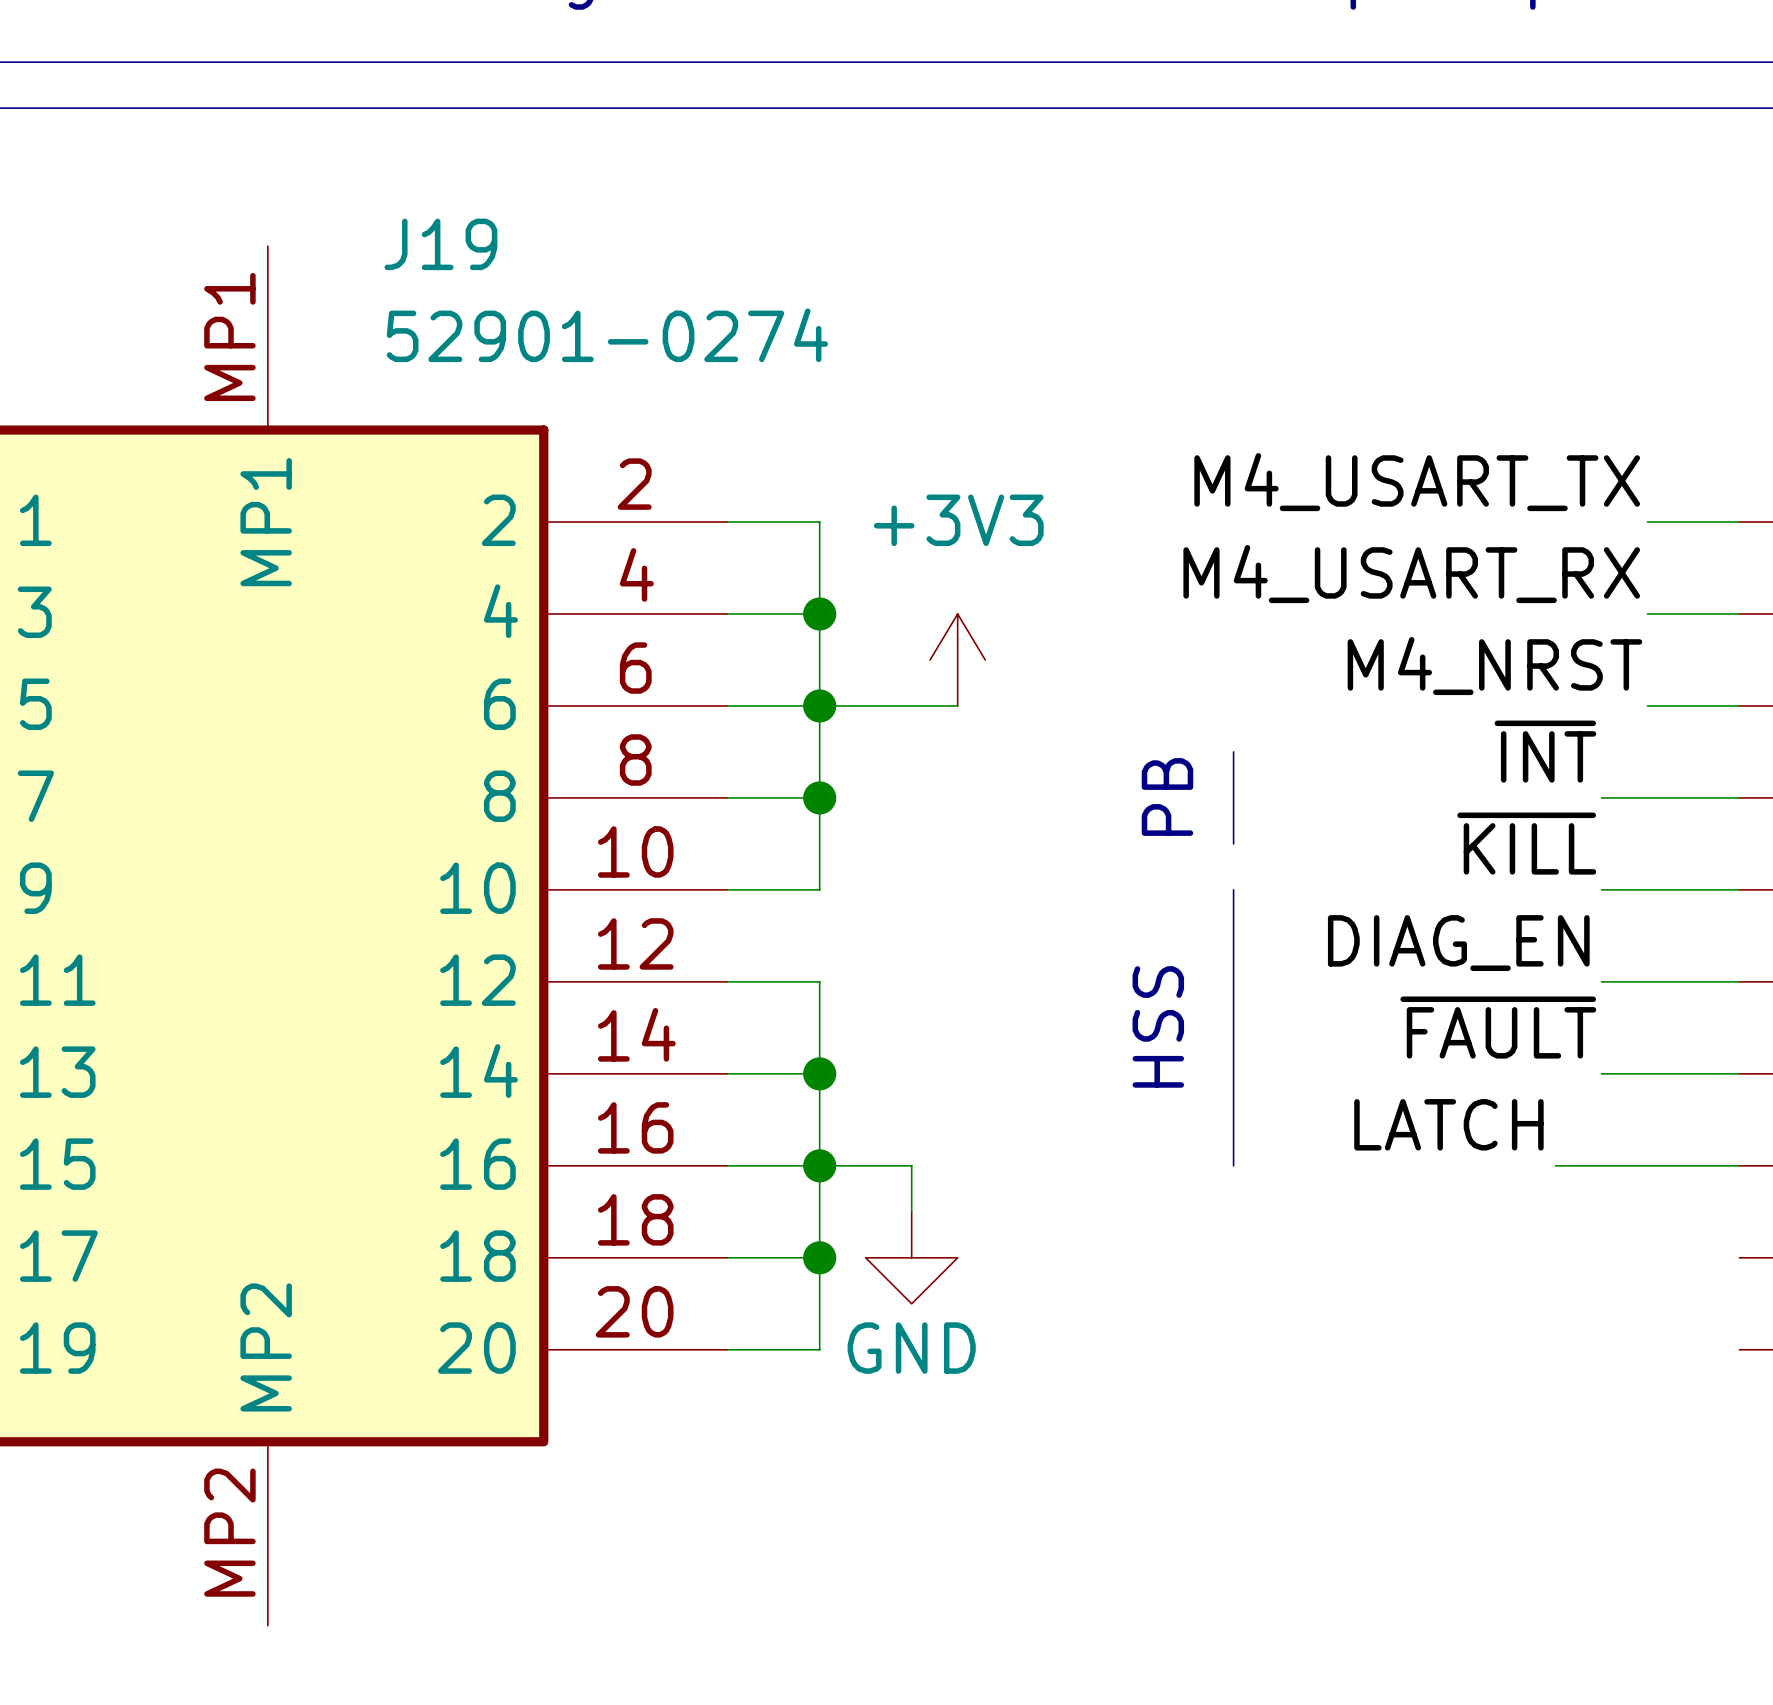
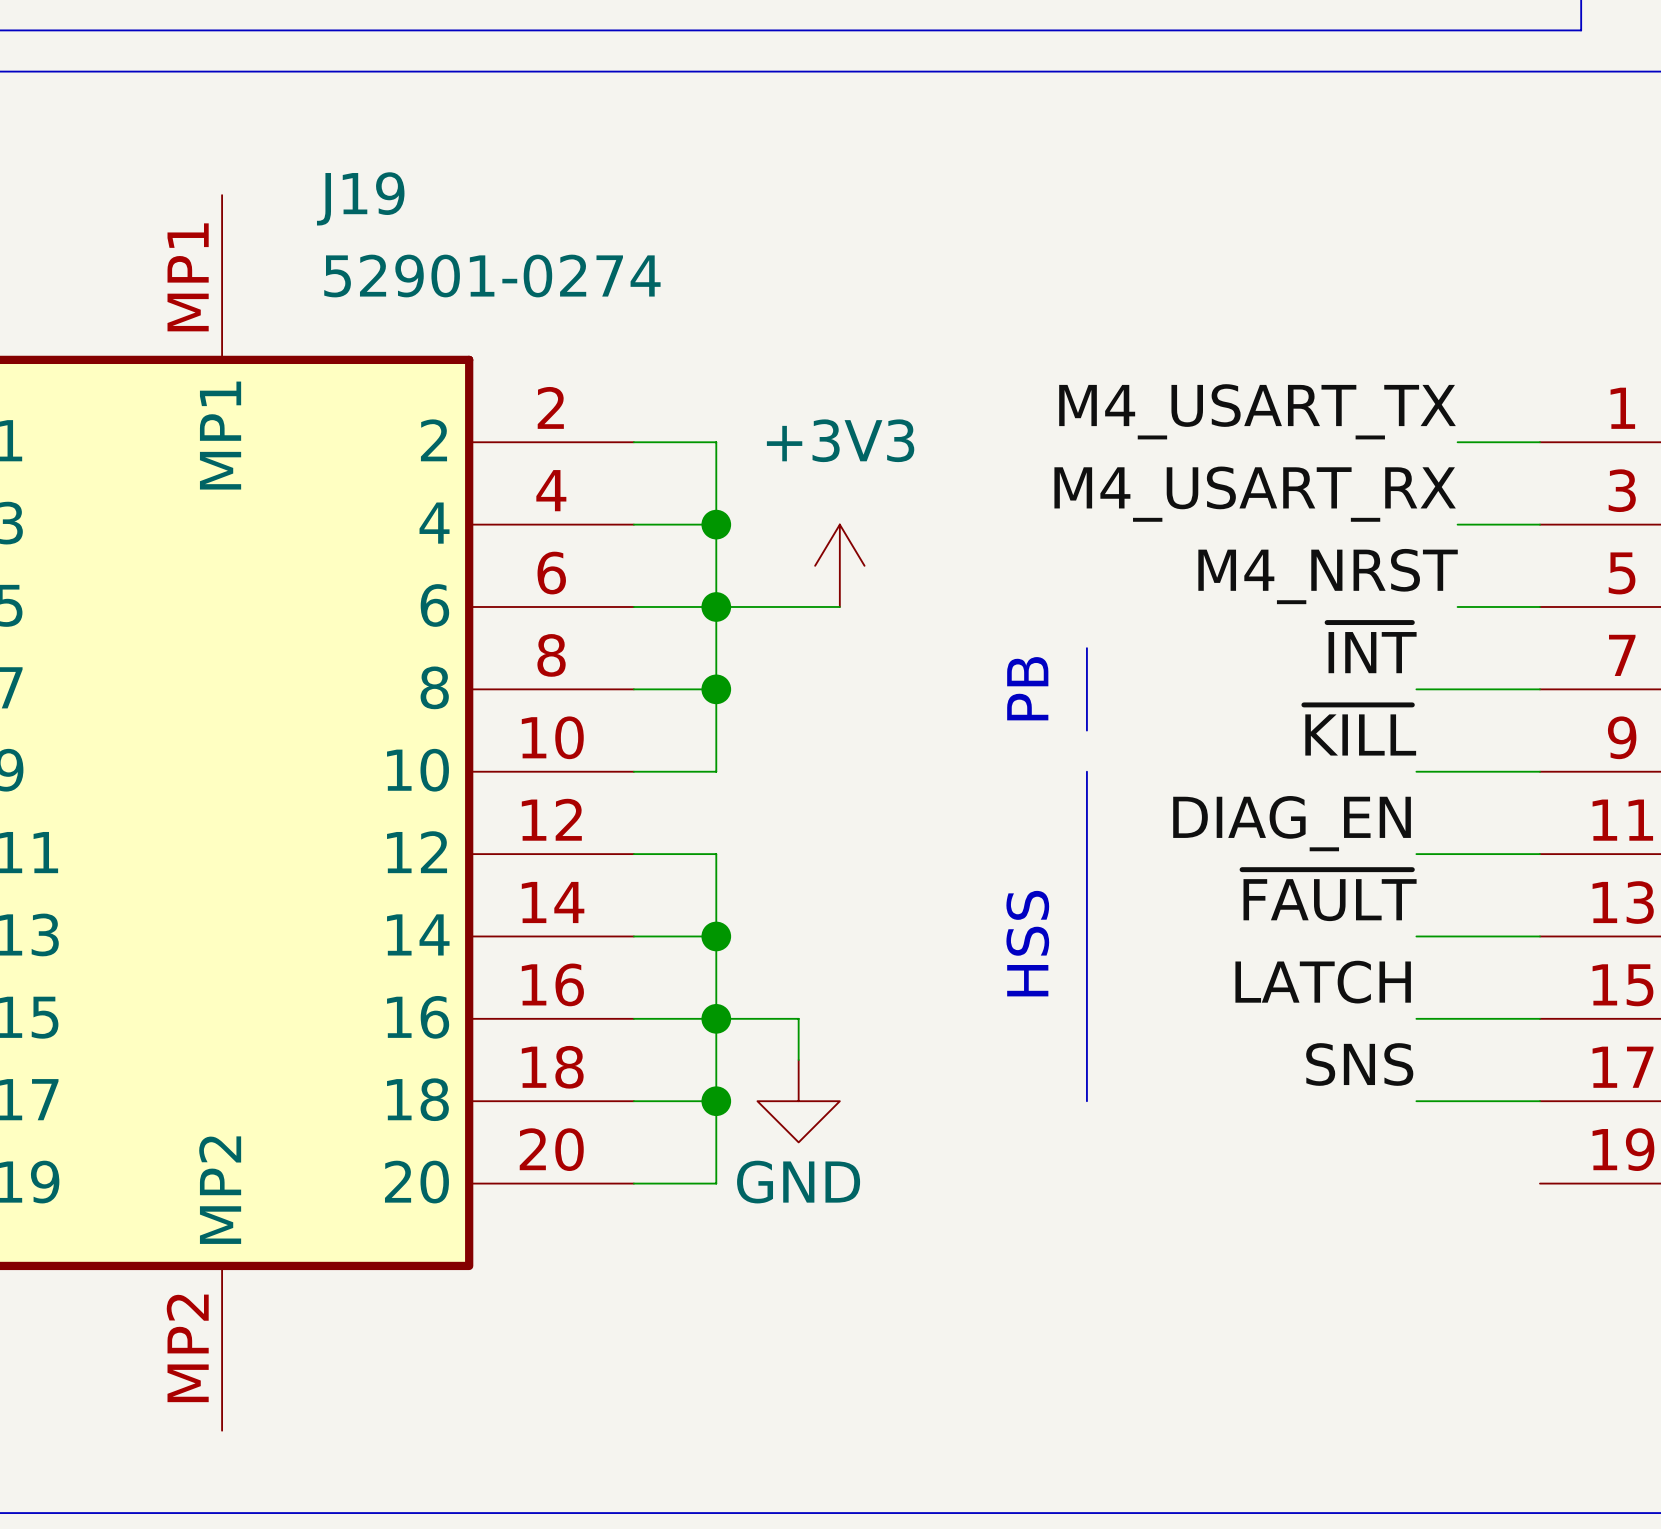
text position: HSS (1158, 1026) -> HSS (1027, 943)
label position: LATCH (1448, 1124) -> LATCH (1323, 982)
line: none -> (1086, 1018) (1086, 1101)
wire: (1555, 1165) (1601, 1165) -> none
label: none -> SNS (1359, 1064)
wire: none -> (1416, 1101) (1539, 1101)

